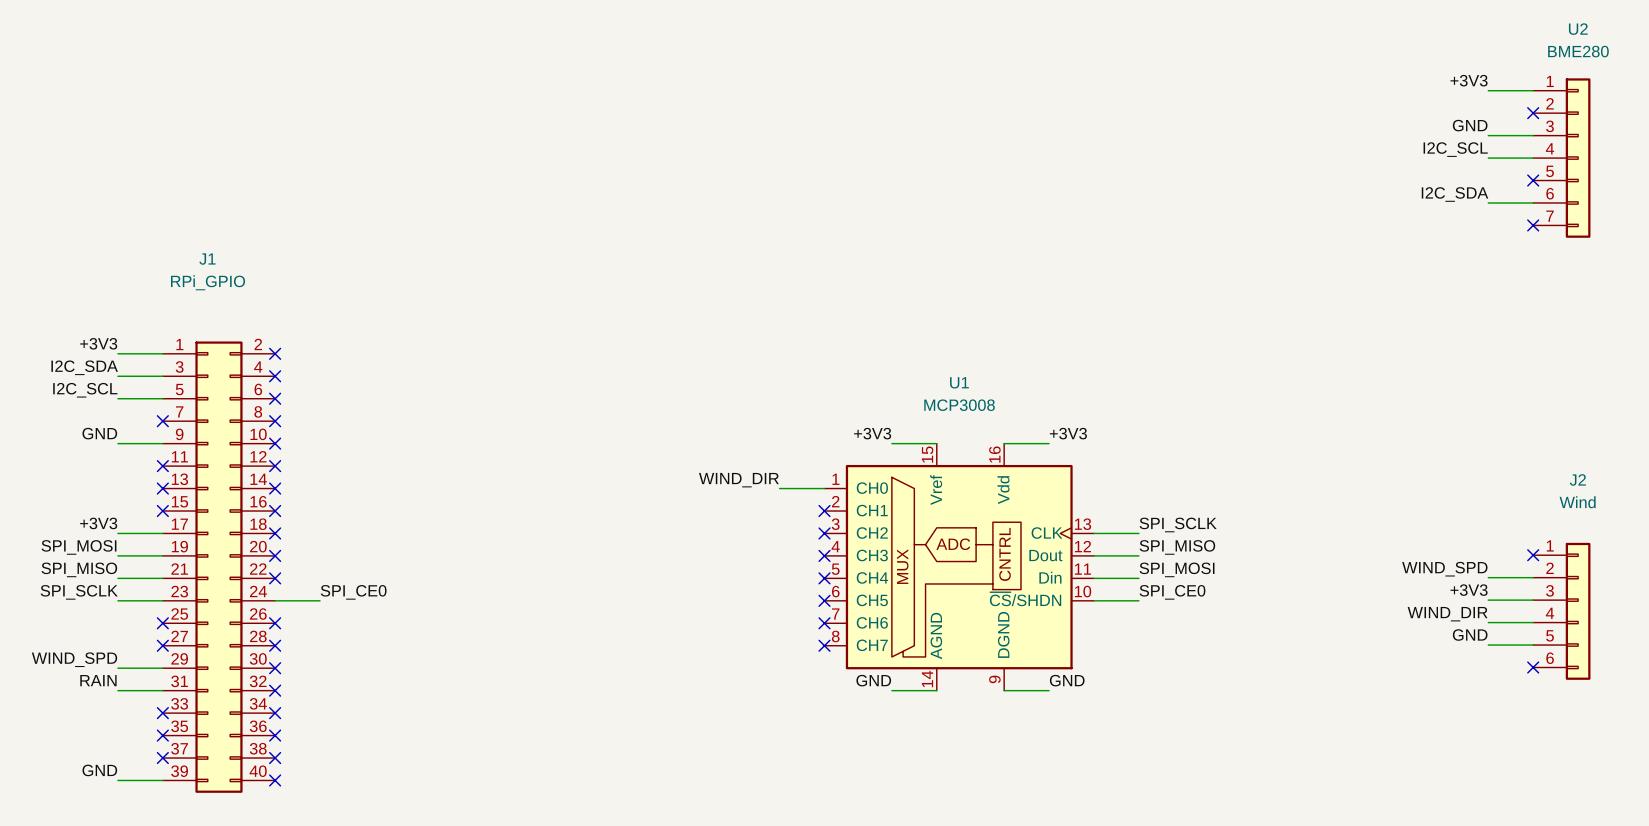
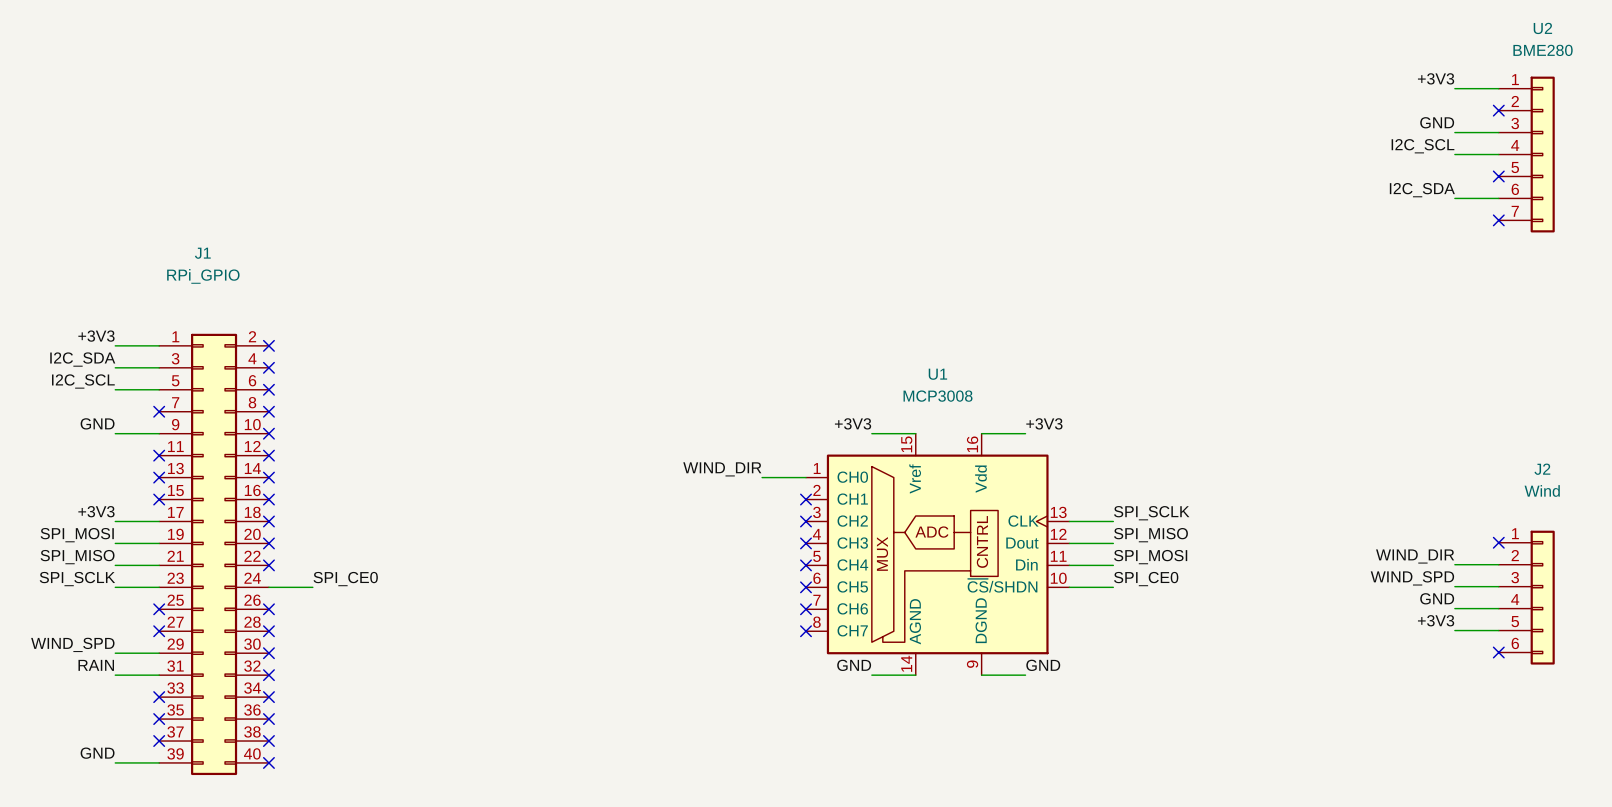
label: WIND_SPD (1444, 569) -> WIND_DIR (1415, 556)
label: +3V3 (1469, 590) -> WIND_SPD (1412, 578)
label: WIND_DIR (1447, 614) -> GND (1437, 598)
label: GND (1470, 635) -> +3V3 (1436, 620)

